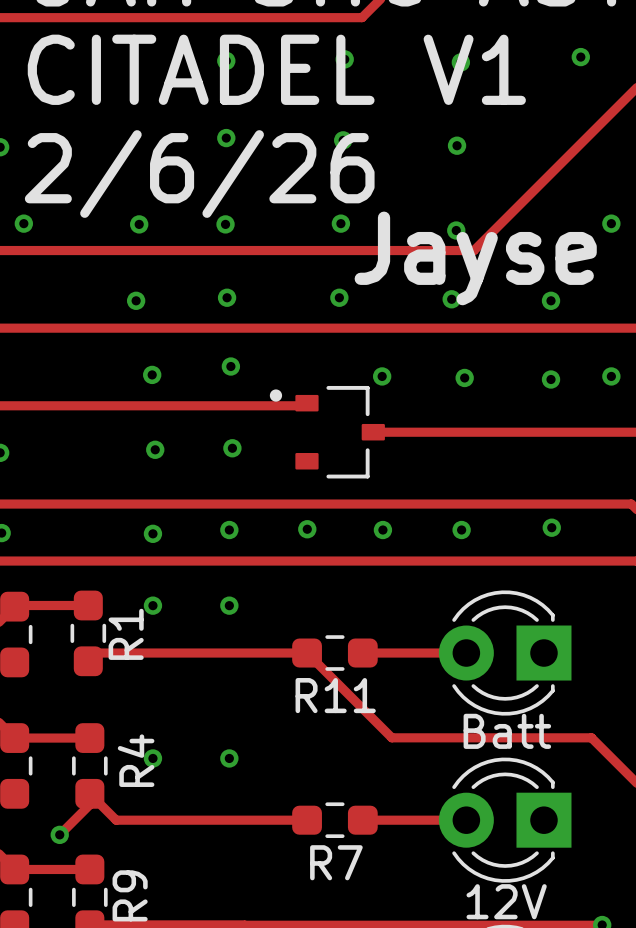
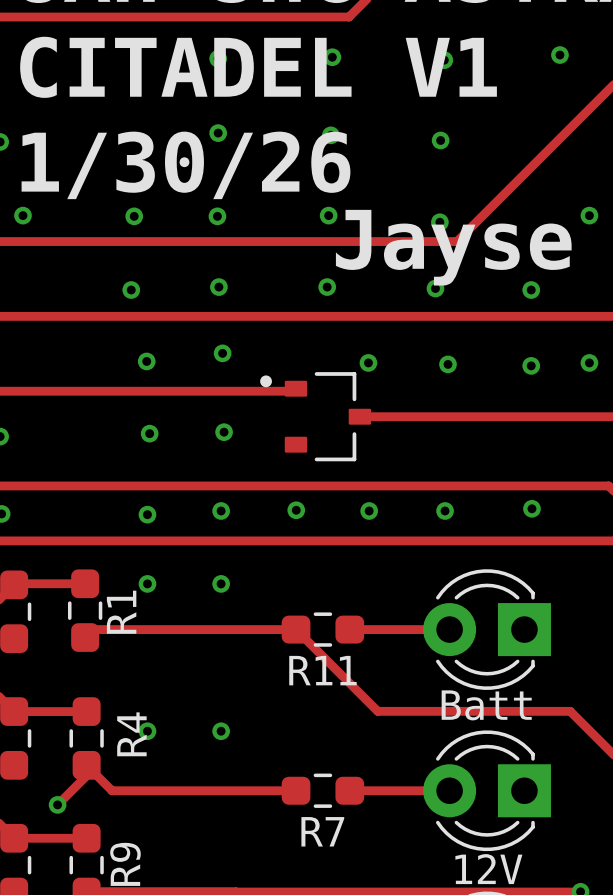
text: 2/6/26 (199, 174) -> 1/30/26 (185, 165)

